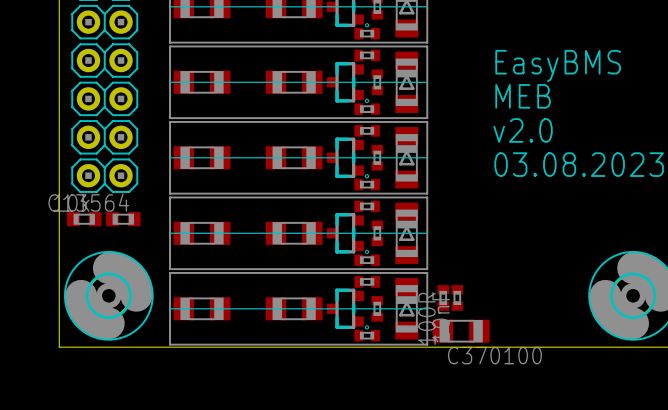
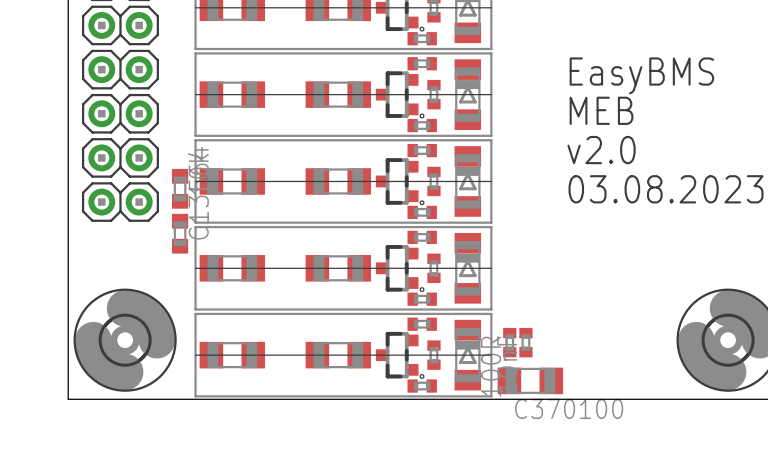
part rotation: 0° (84, 219) -> 90° clockwise (180, 188)
part position: (84, 219) -> (180, 188)
part rotation: 0° (123, 219) -> 90° clockwise (180, 233)
part position: (123, 219) -> (180, 233)

